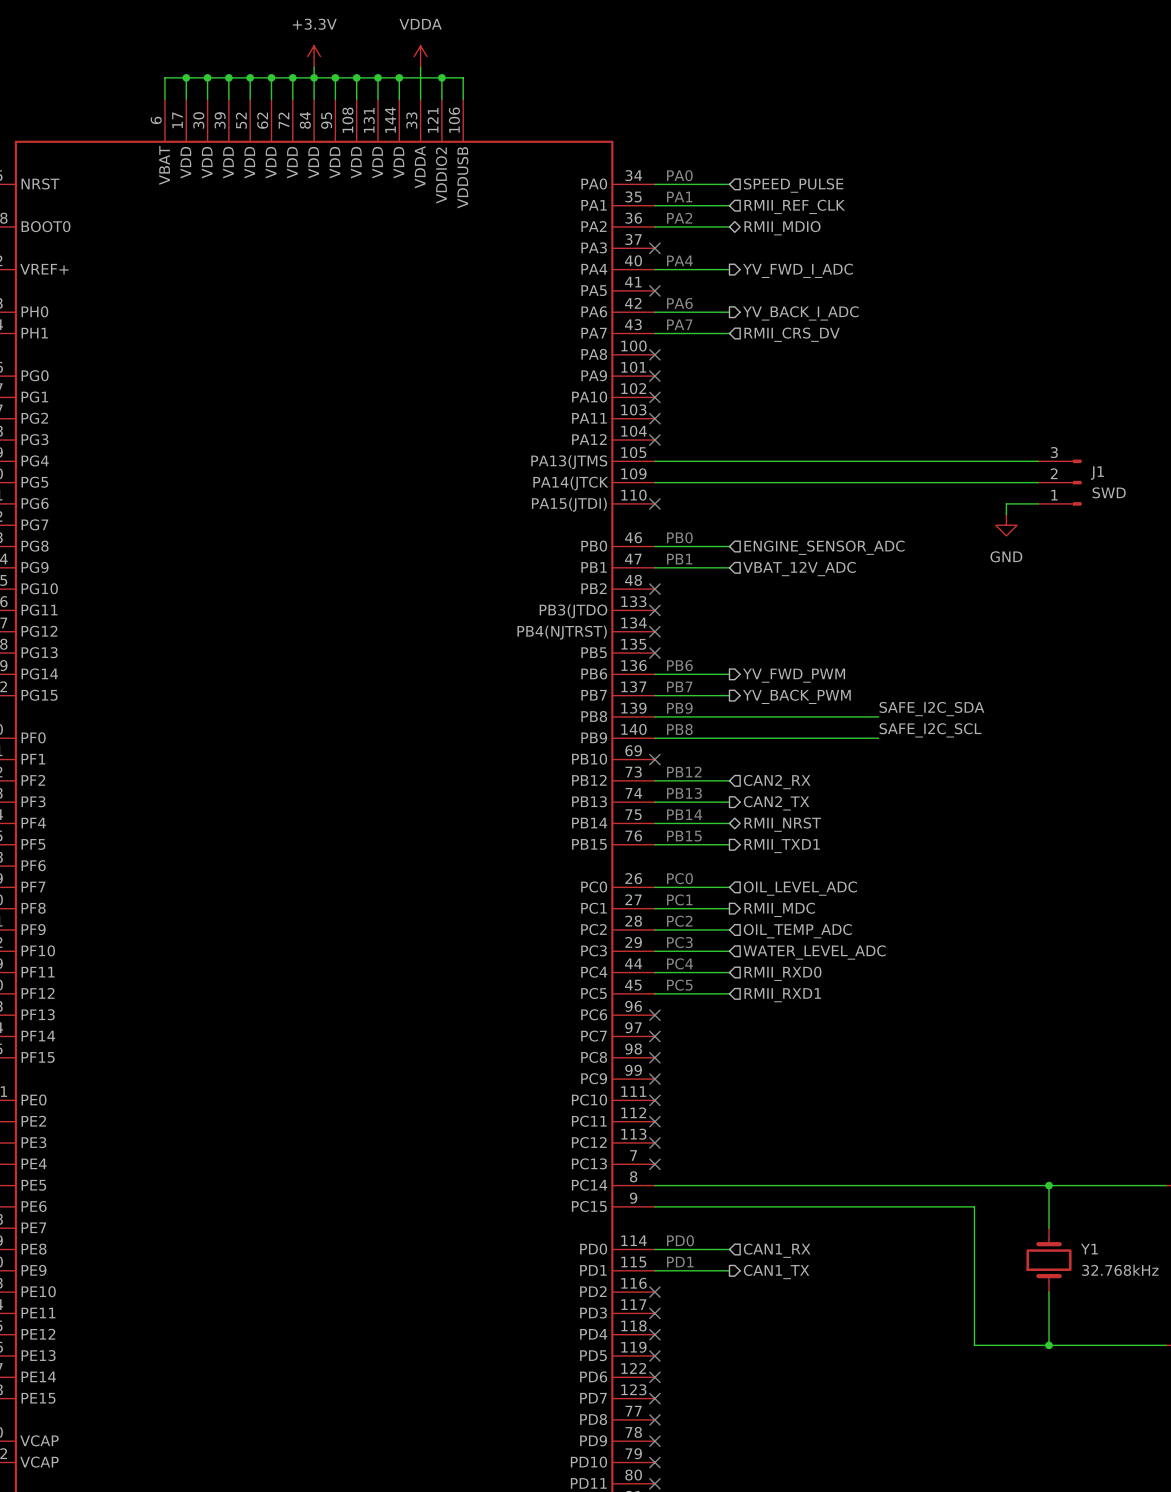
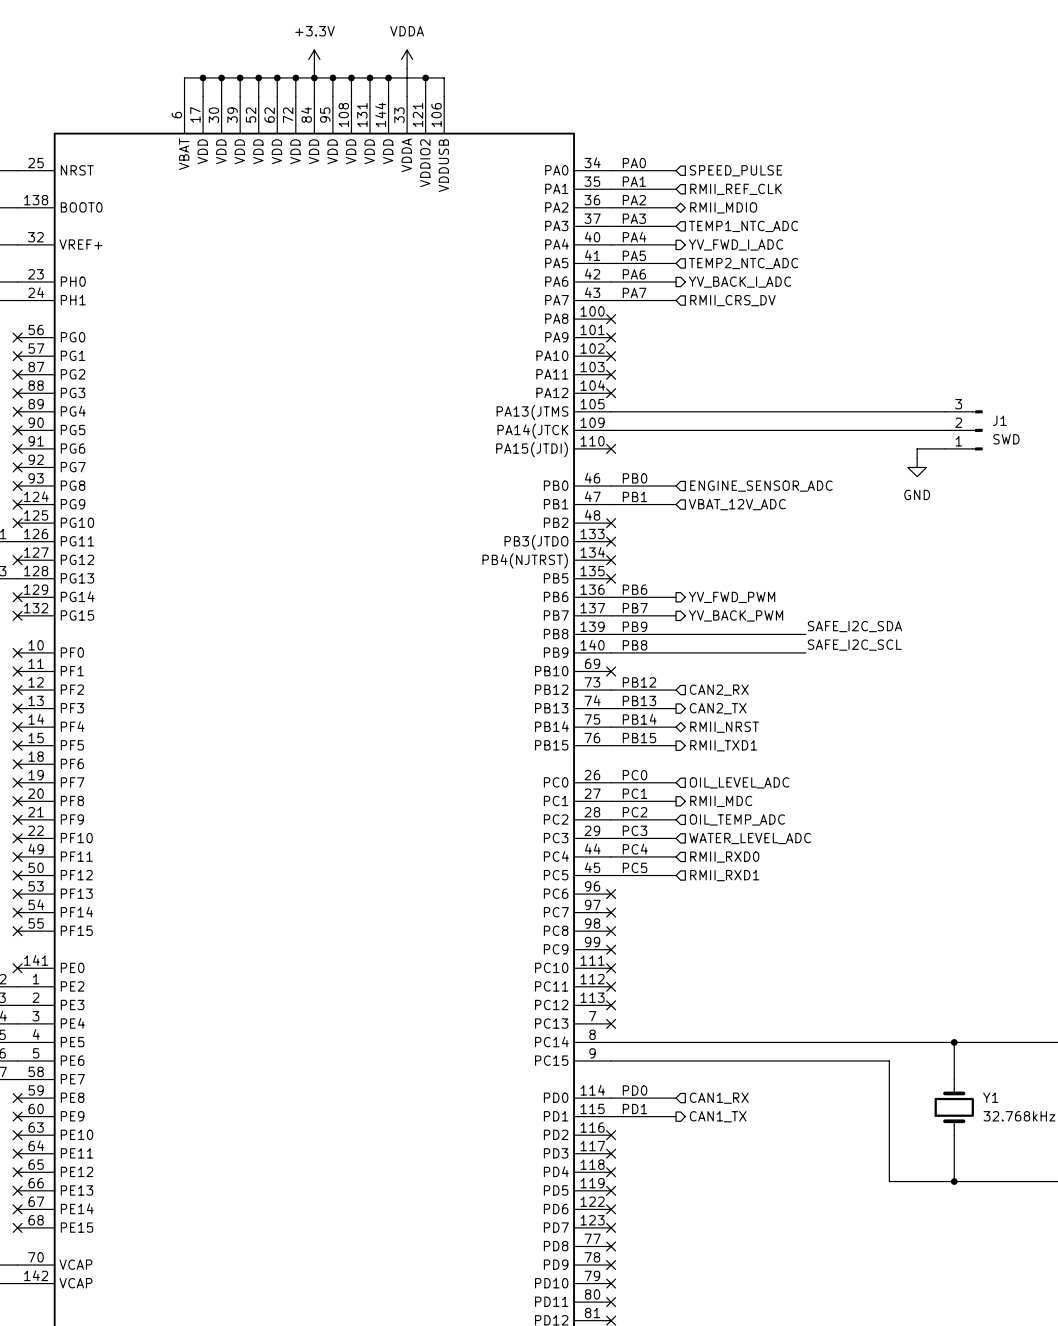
text: none -> PA3 (634, 218)
wire: none -> (611, 226) (676, 226)
no-connect mark: (654, 248) -> none
hierarchical label: none -> TEMP1_NTC_ADC (743, 226)
text: none -> PA5 (634, 255)
wire: none -> (611, 263) (676, 263)
no-connect mark: (654, 290) -> none
hierarchical label: none -> TEMP2_NTC_ADC (743, 263)

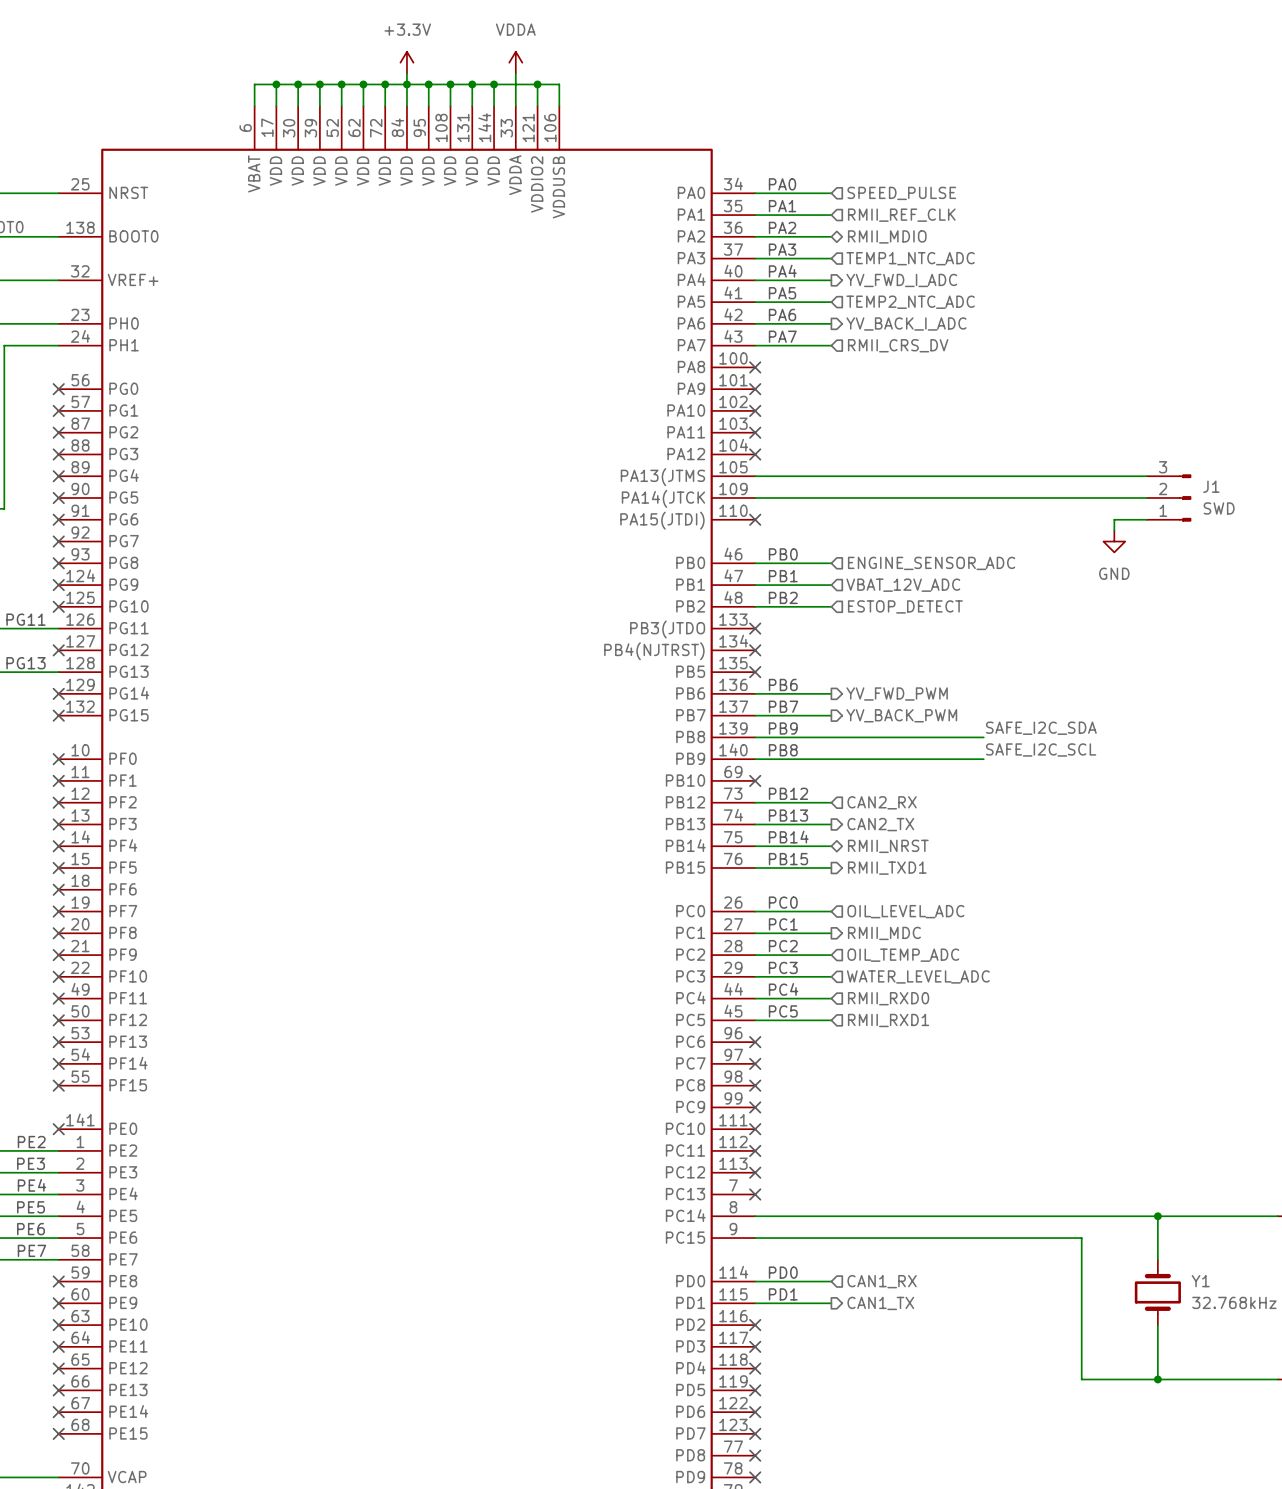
text: none -> PB2 (783, 597)
wire: none -> (755, 606) (831, 606)
no-connect mark: (611, 523) -> none
hierarchical label: none -> ESTOP_DETECT (905, 606)

